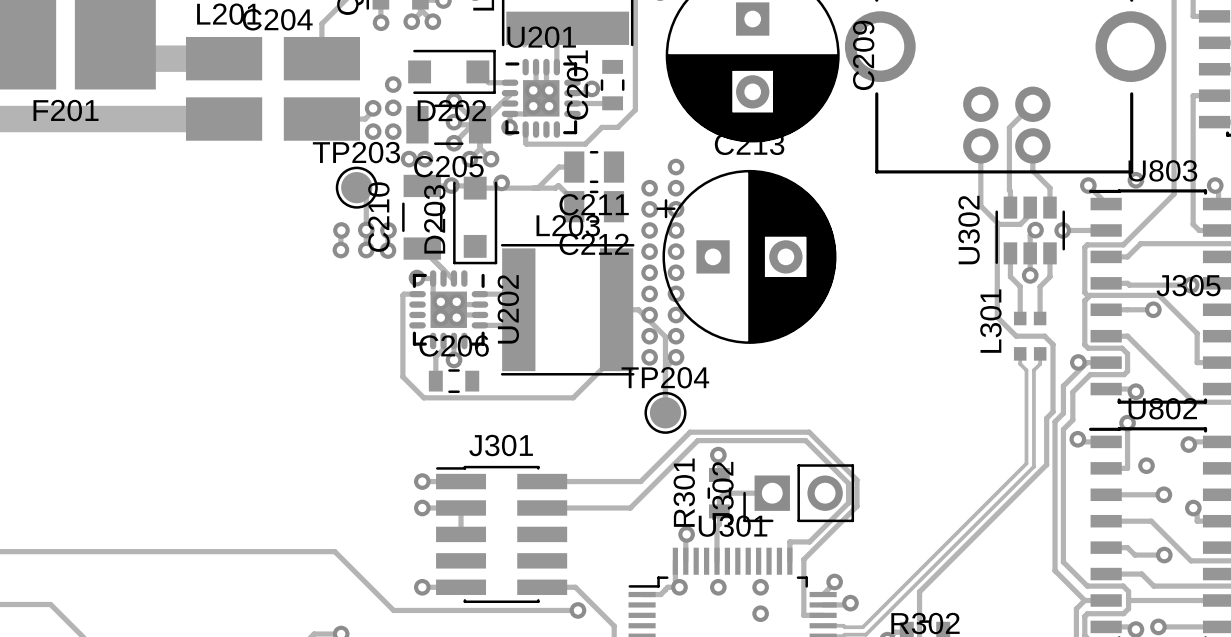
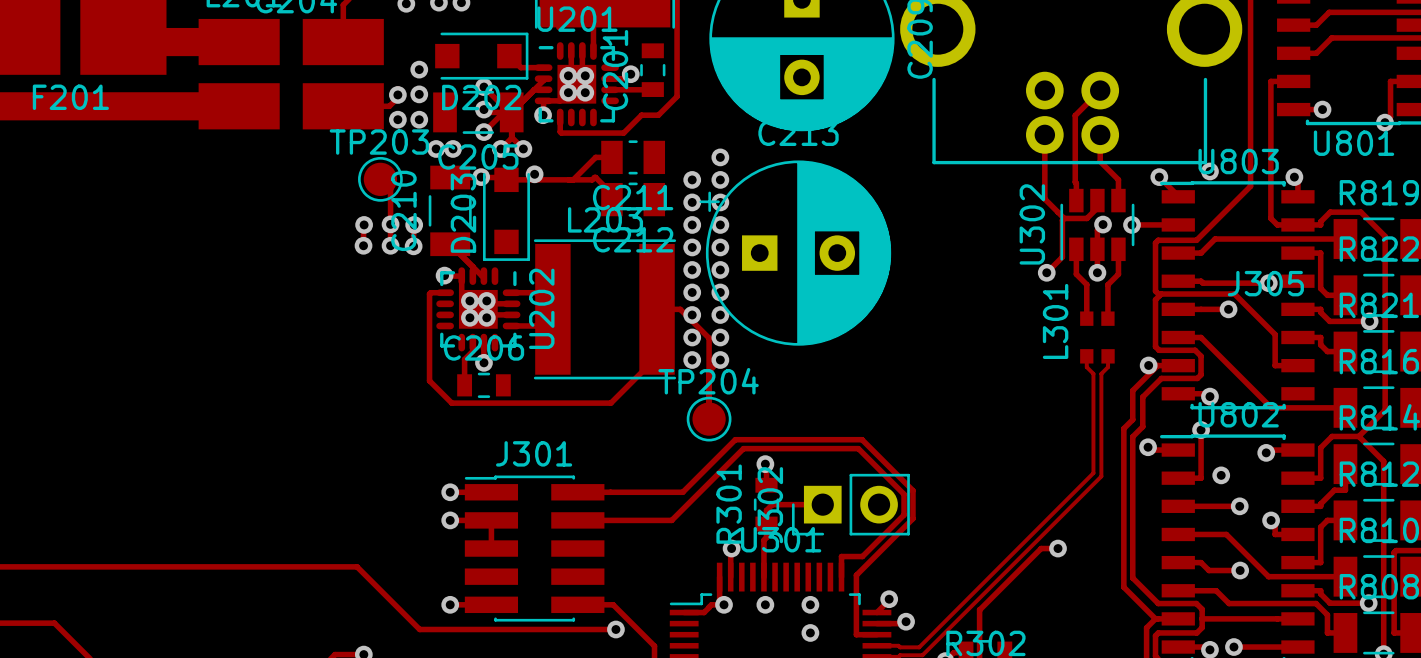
track: (997, 260) (997, 317) (1016, 336) (1044, 336) (1053, 344) (1053, 411) (1046, 418) (1046, 464) (919, 591) -> (1058, 548) (1041, 548) (980, 609)
track: none -> (1062, 257) (1046, 272)
via: none -> (1046, 272)
via: none -> (1058, 548)

